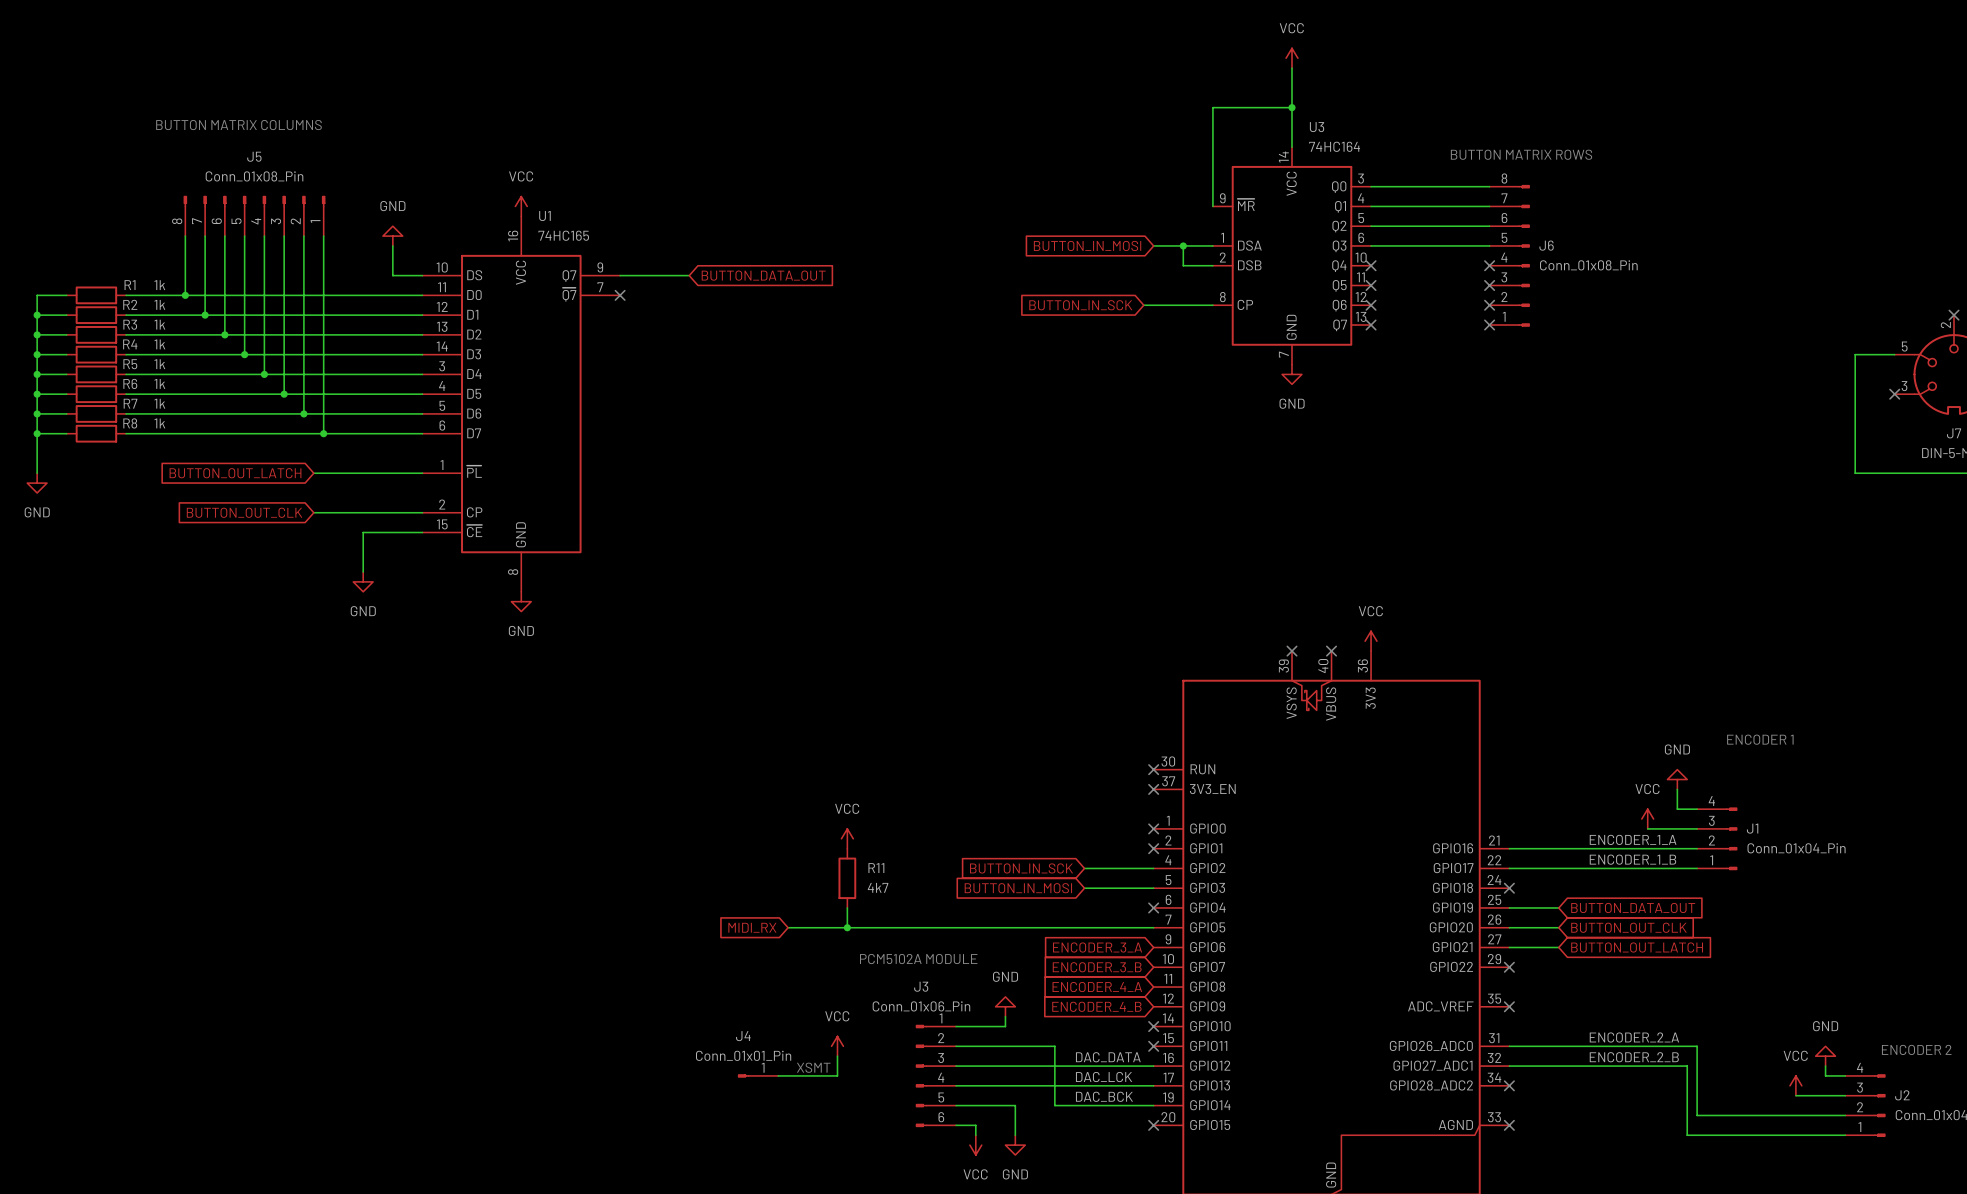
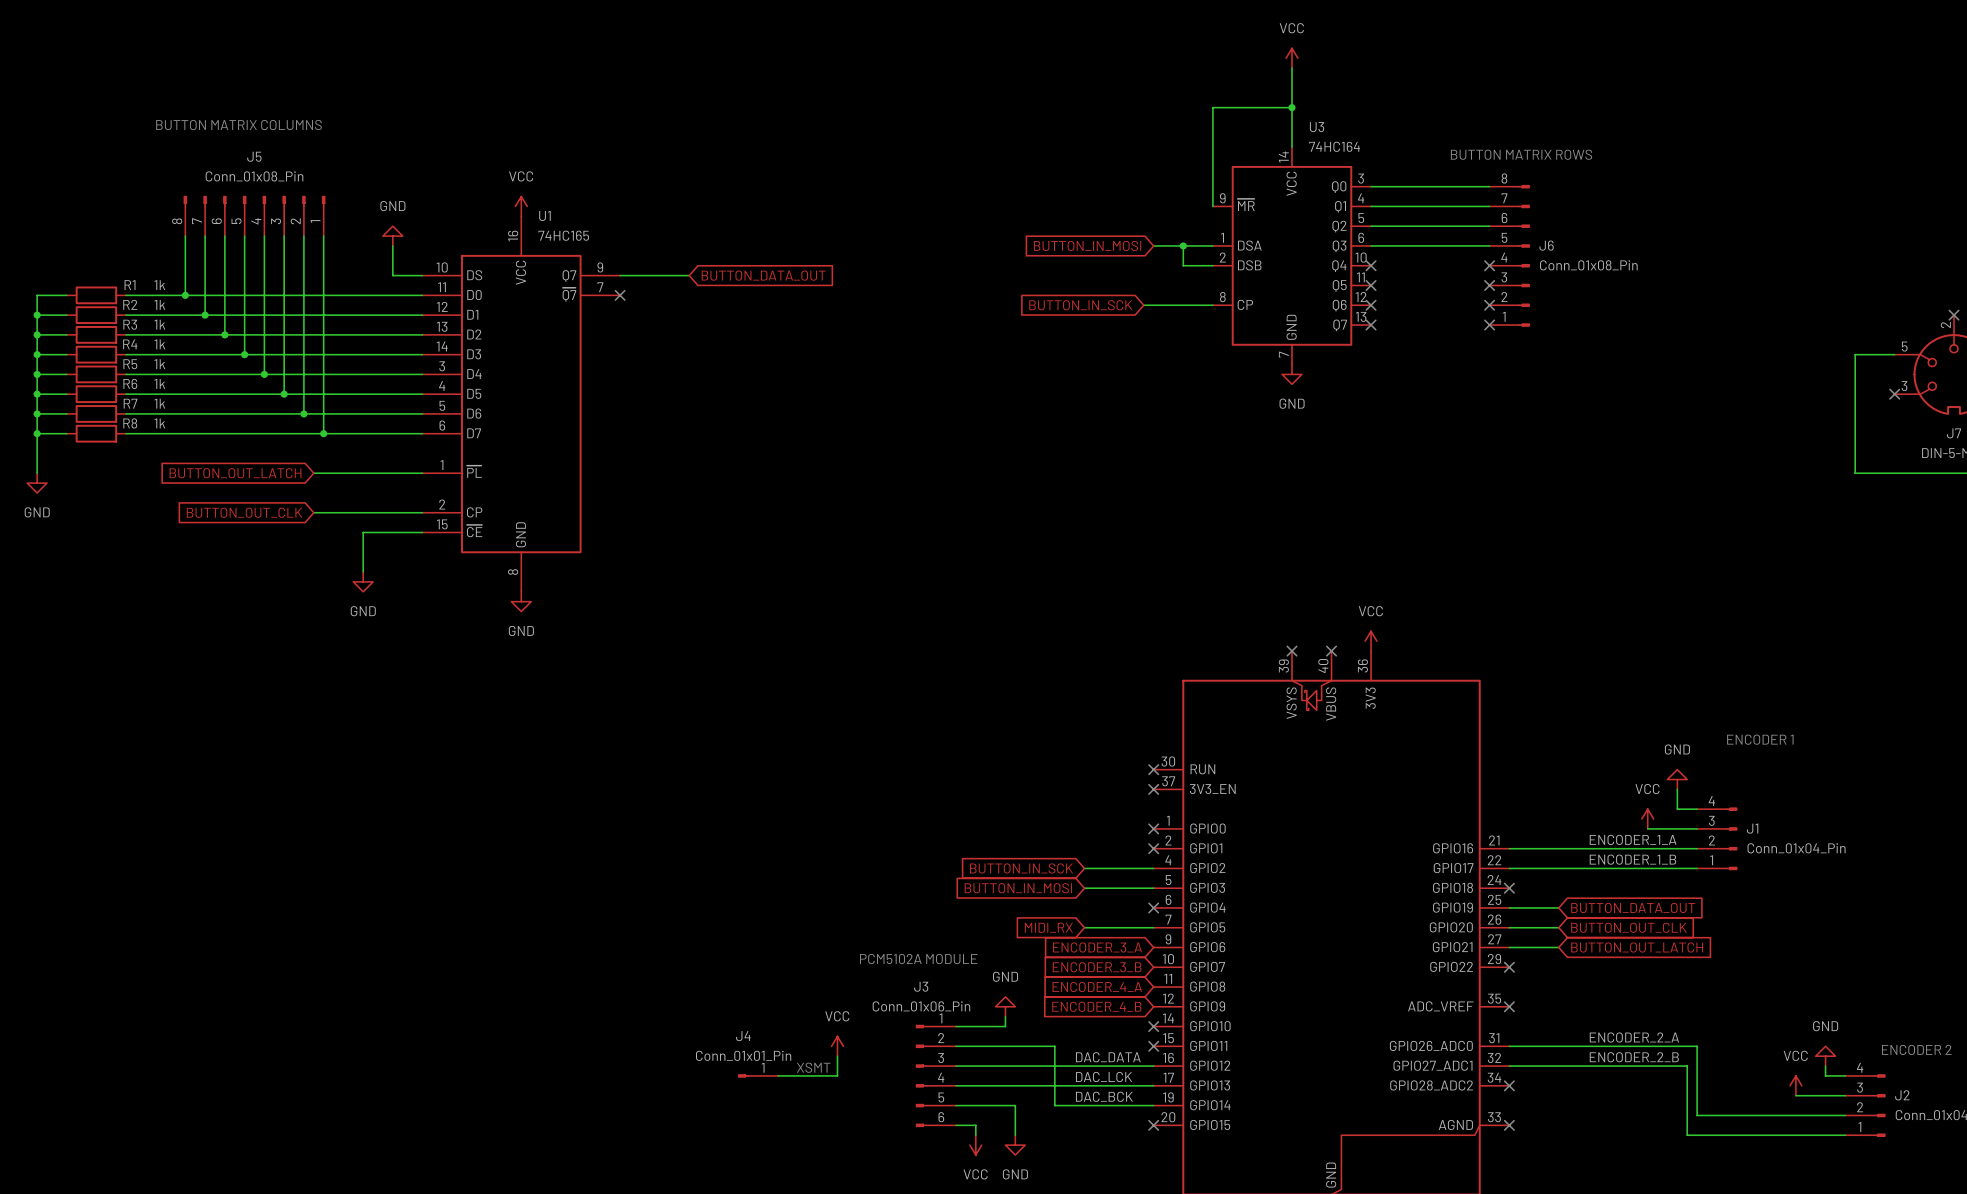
power symbol: VCC (847, 838) -> none
R11: 4k7 (847, 878) -> none
wire: (847, 907) (847, 927) -> none
global label: MIDI_RX (752, 927) -> none
wire: (788, 927) (1084, 927) -> none
junction: (847, 927) -> none
global label: none -> MIDI_RX (1048, 927)

